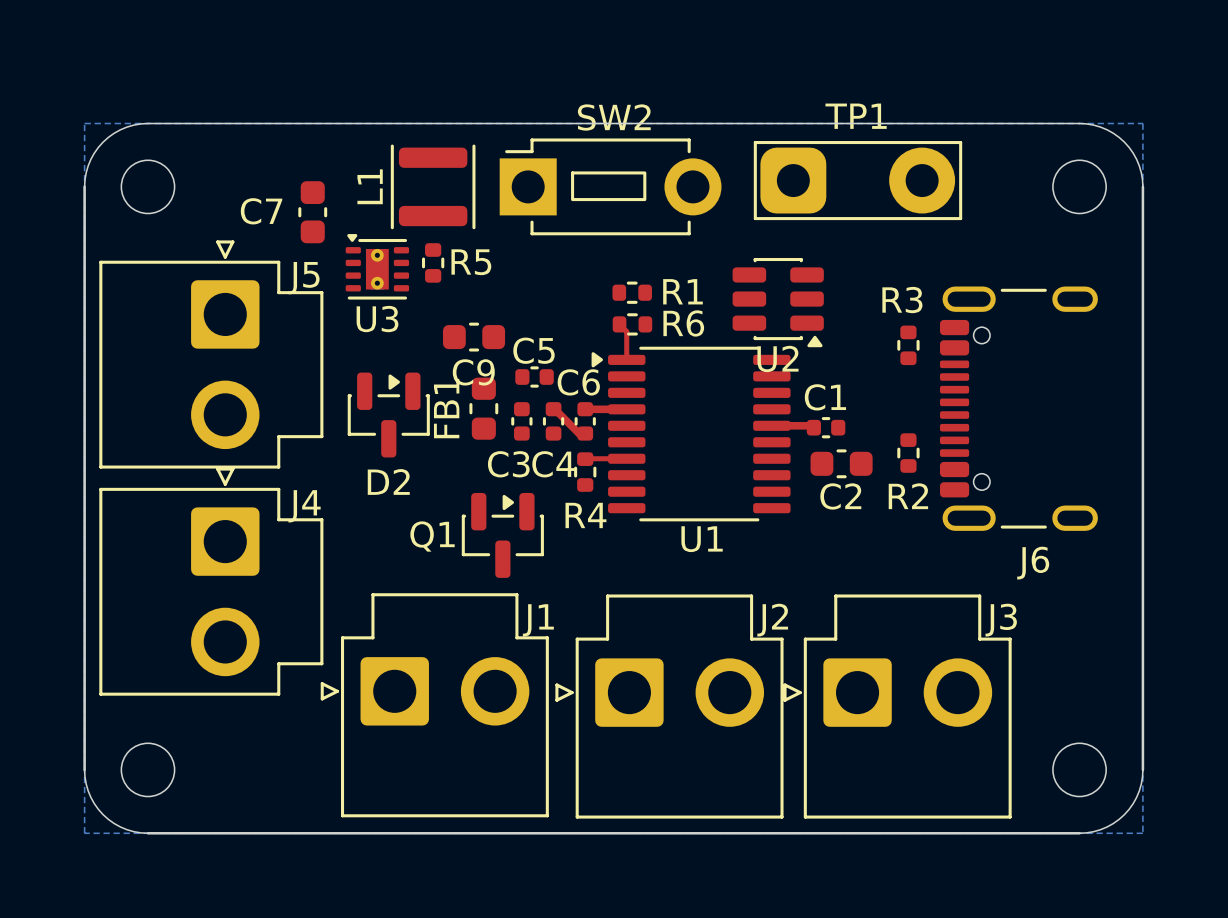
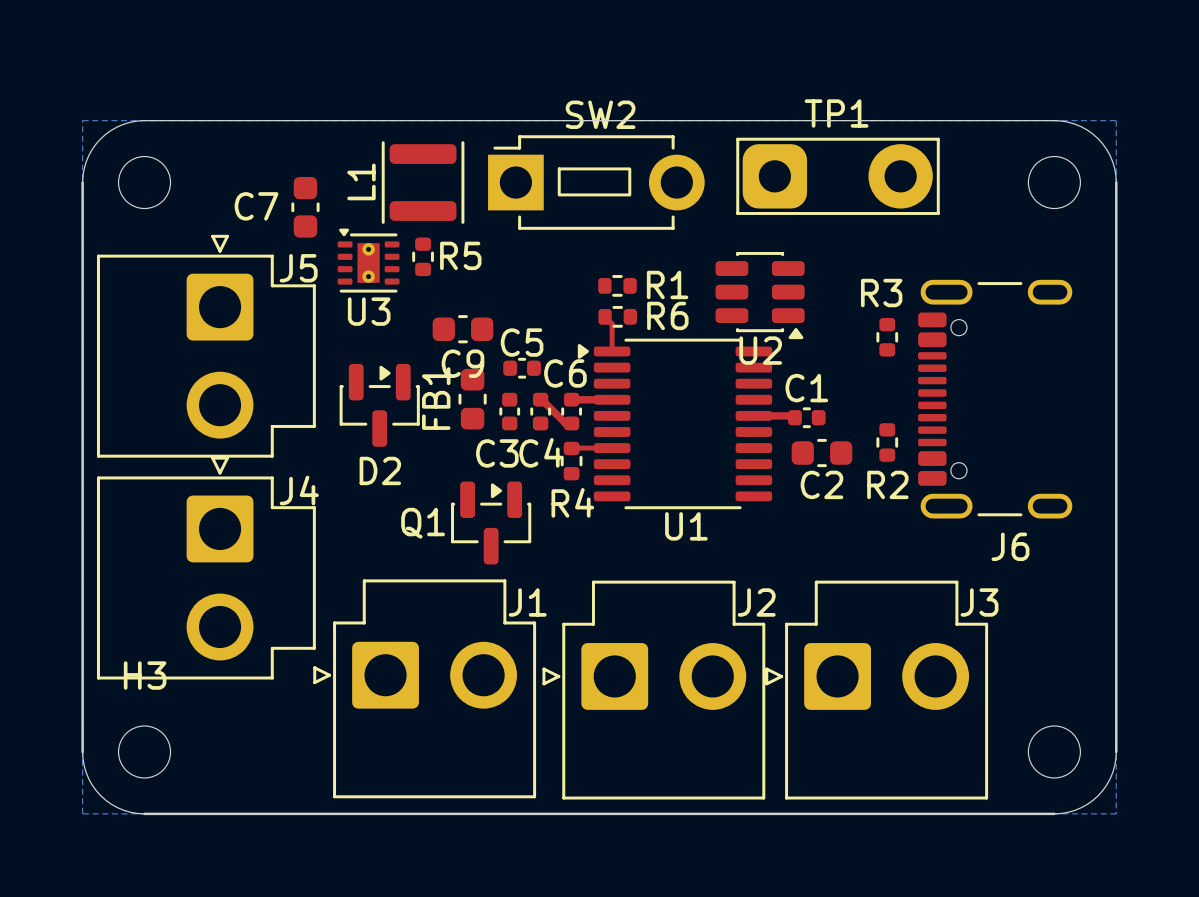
H3 name: none -> H3 (145, 675)

